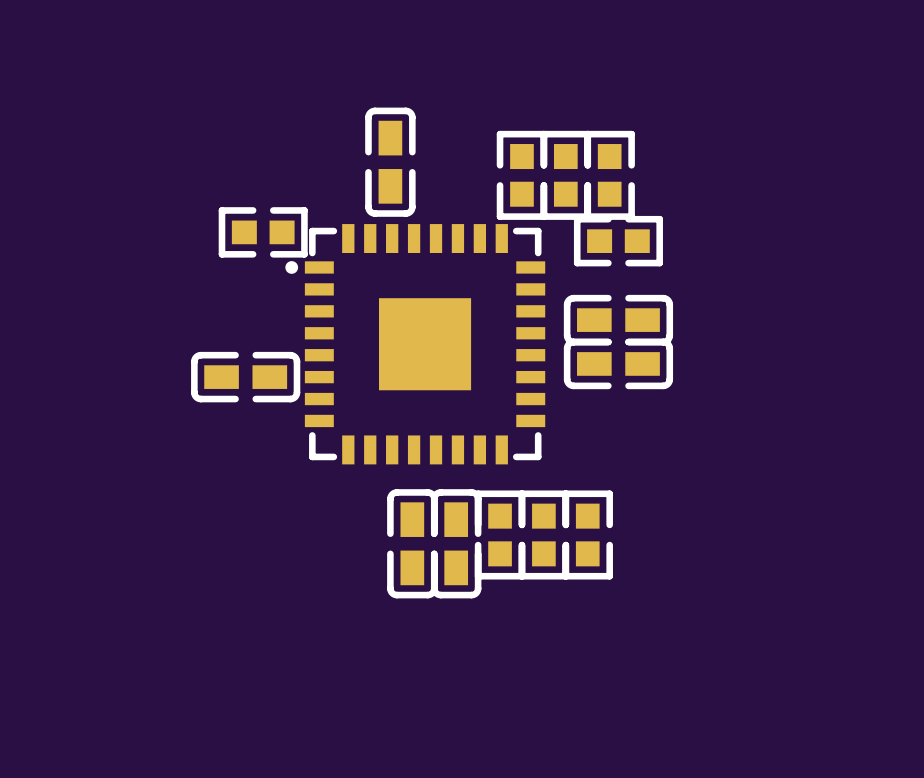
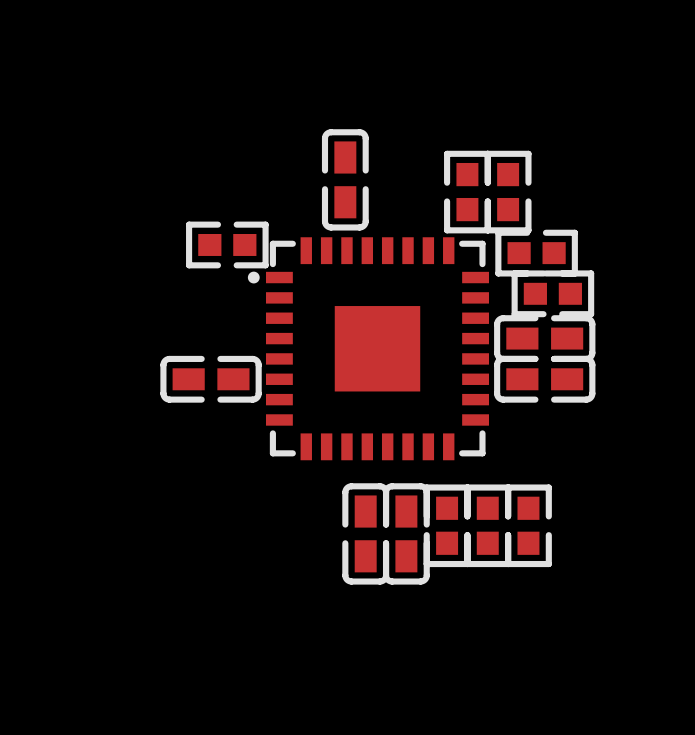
part: (609, 175) -> none
part: none -> (536, 253)
part: (618, 241) -> none
part: none -> (552, 293)
part: (618, 320) -> none
part: none -> (544, 338)
part: (618, 363) -> none
part: none -> (544, 379)

